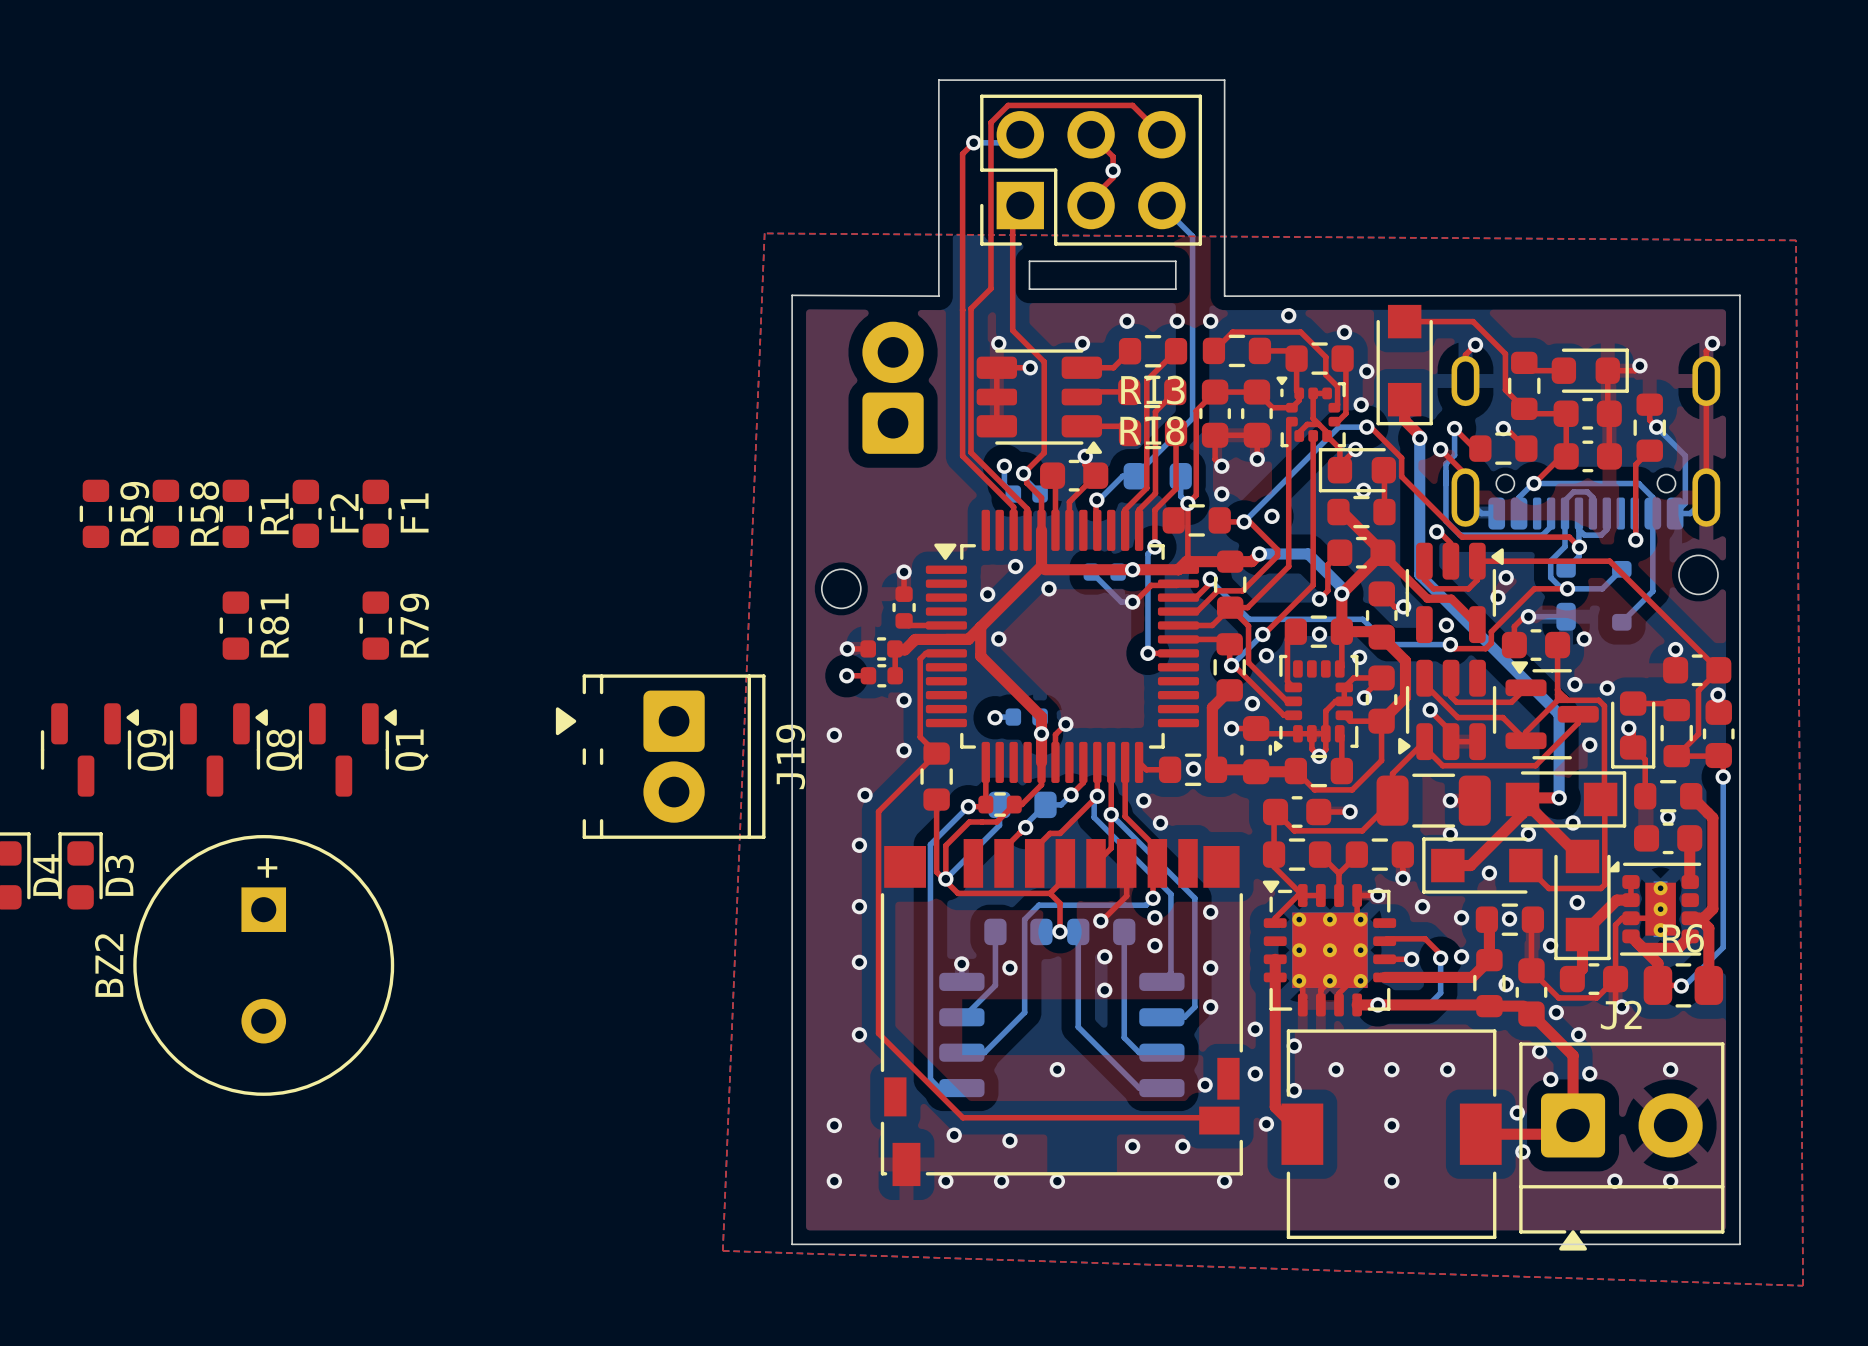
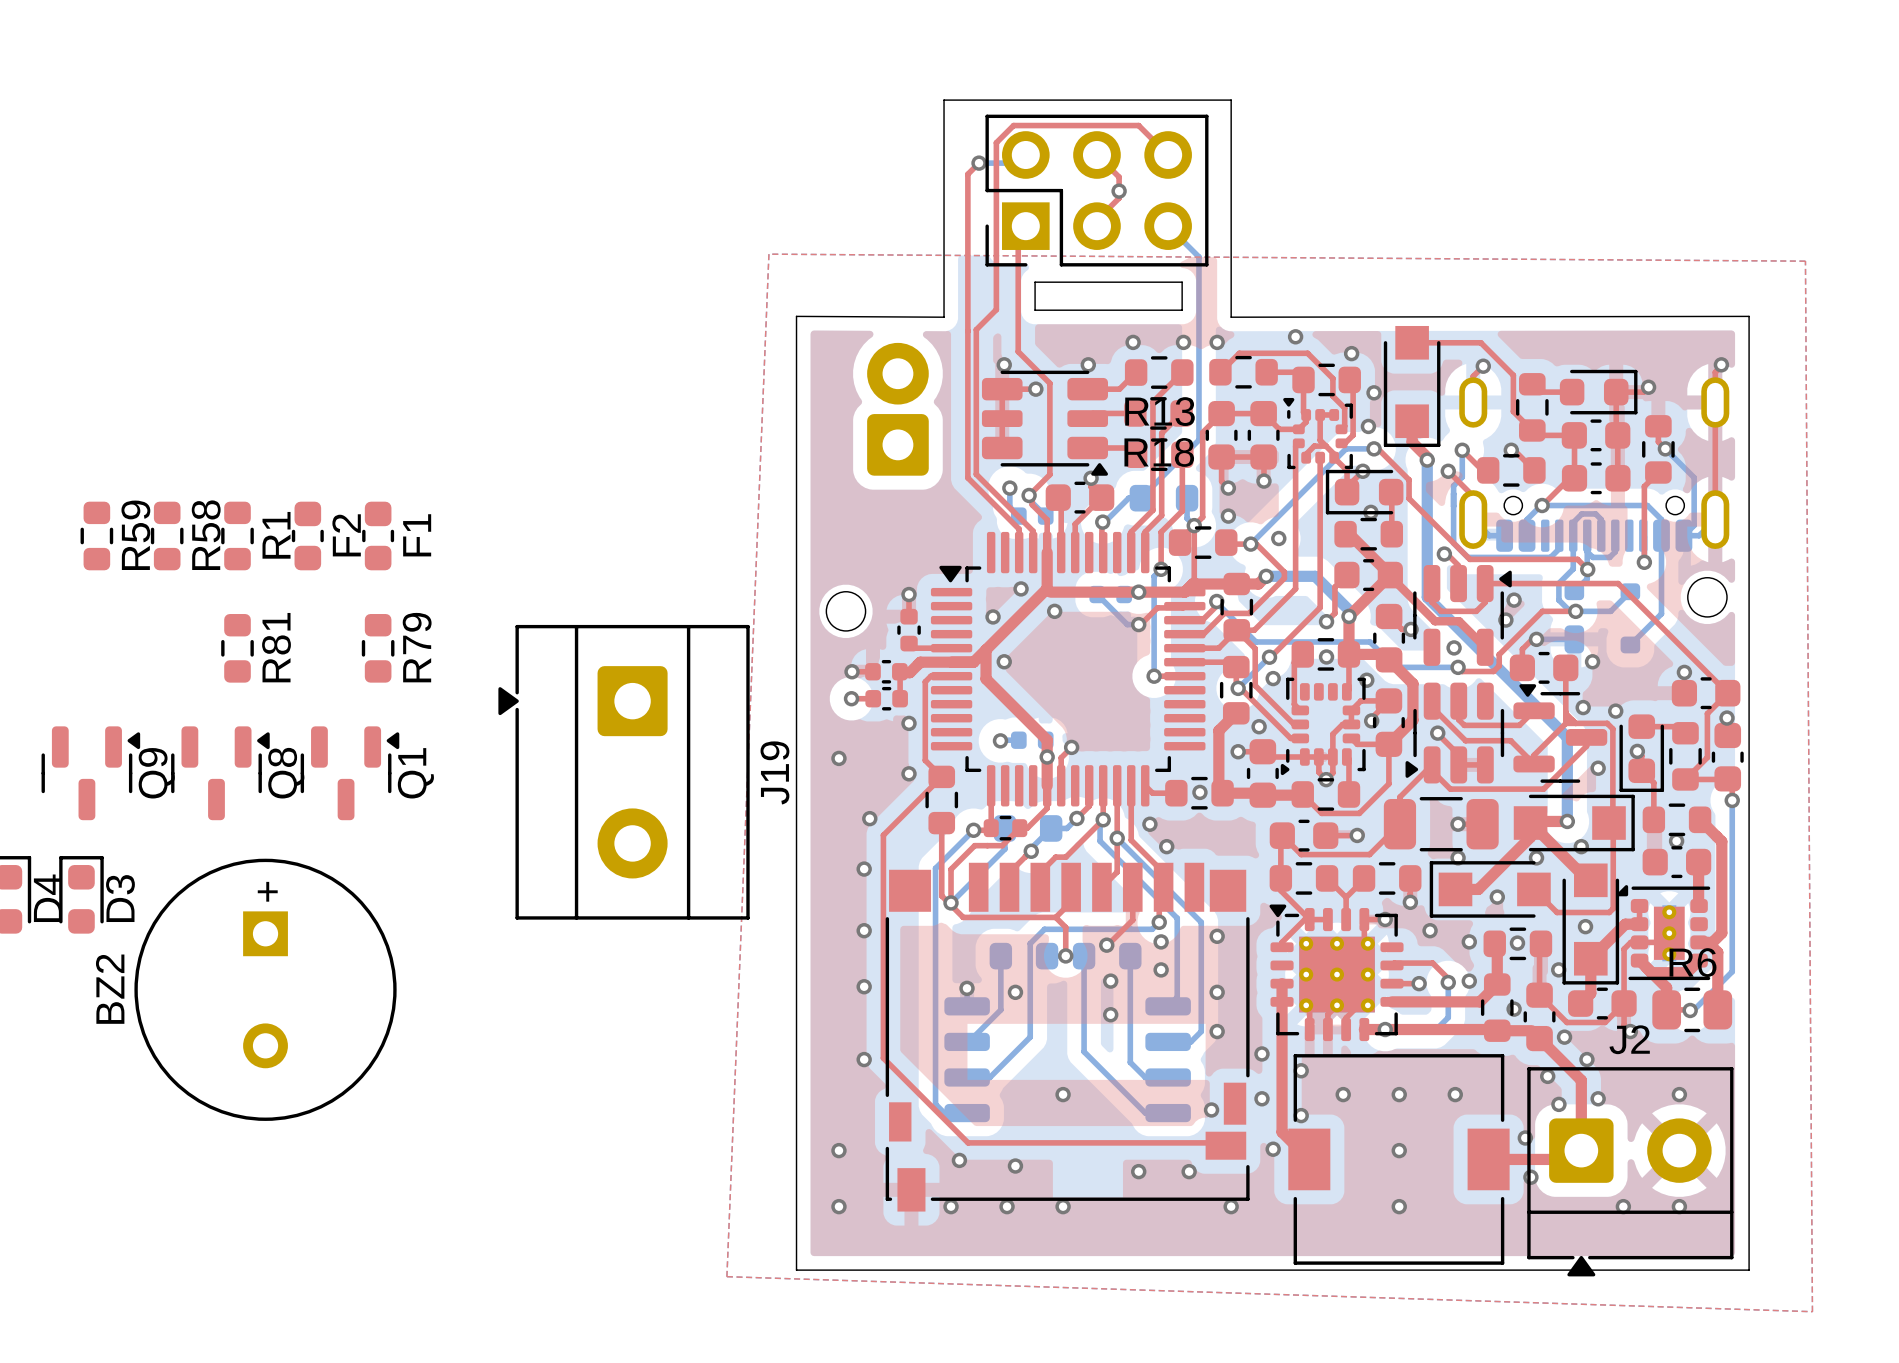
J19 footprint: [555, 674, 766, 839] -> [498, 624, 750, 920]

